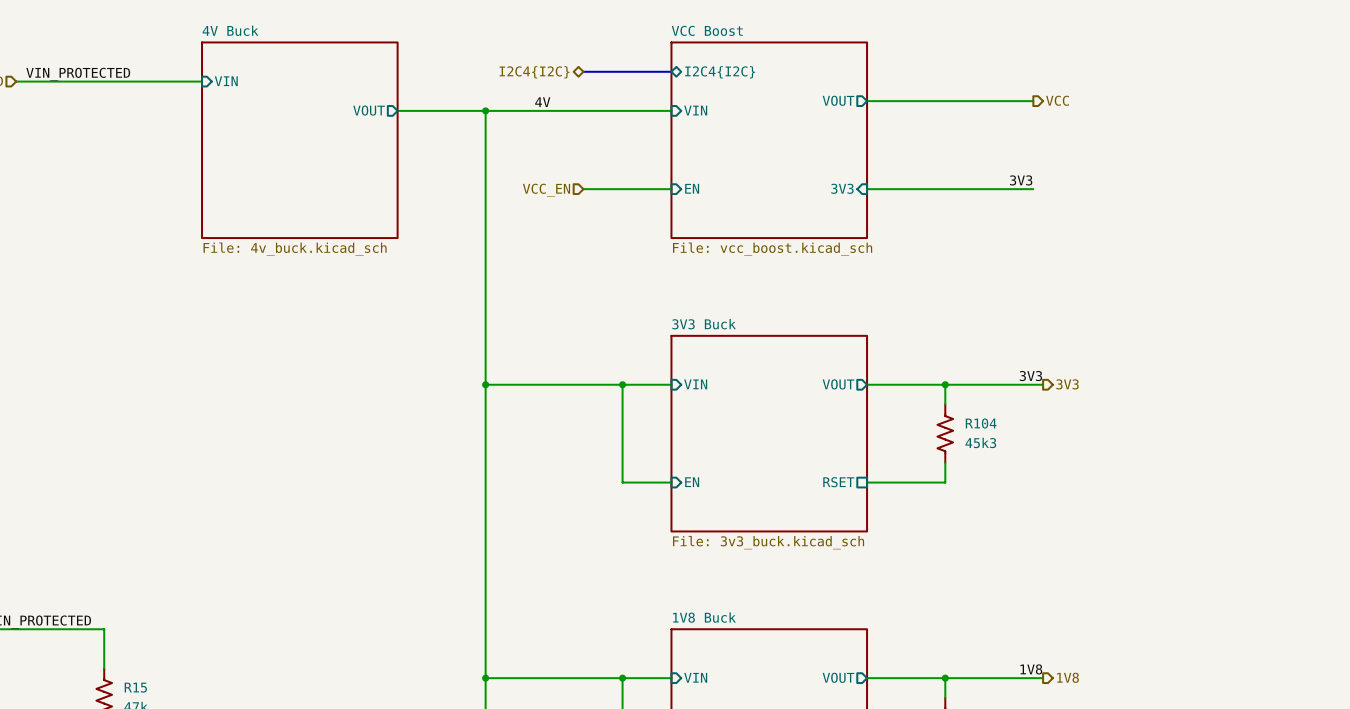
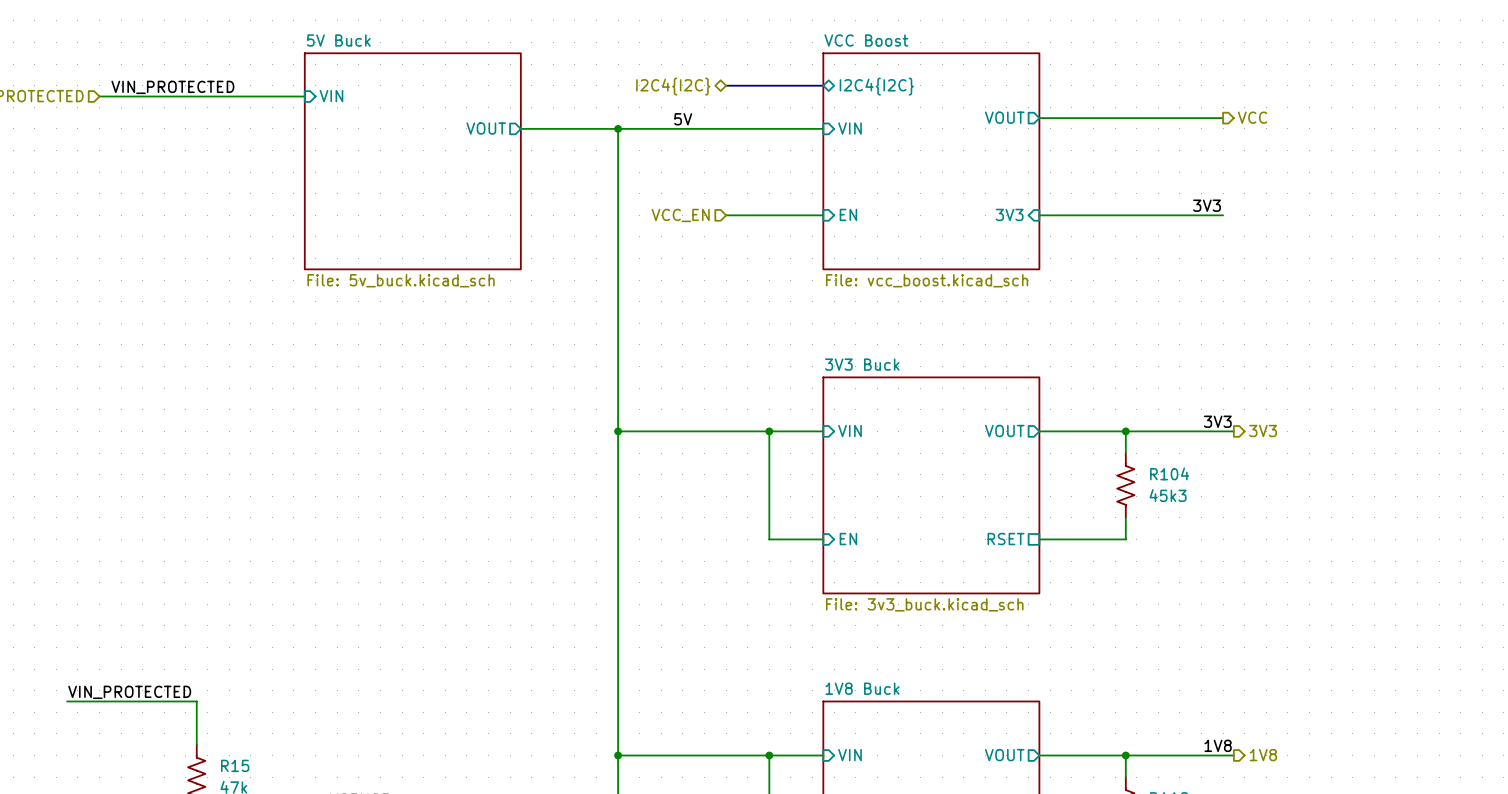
sheet 4V Buck name: 4V Buck (230, 30) -> 5V Buck (338, 40)
label: 4V (542, 102) -> 5V (683, 119)
sheet 4V Buck value: File: 4v_buck.kicad_sch (295, 249) -> File: 5v_buck.kicad_sch (401, 280)

